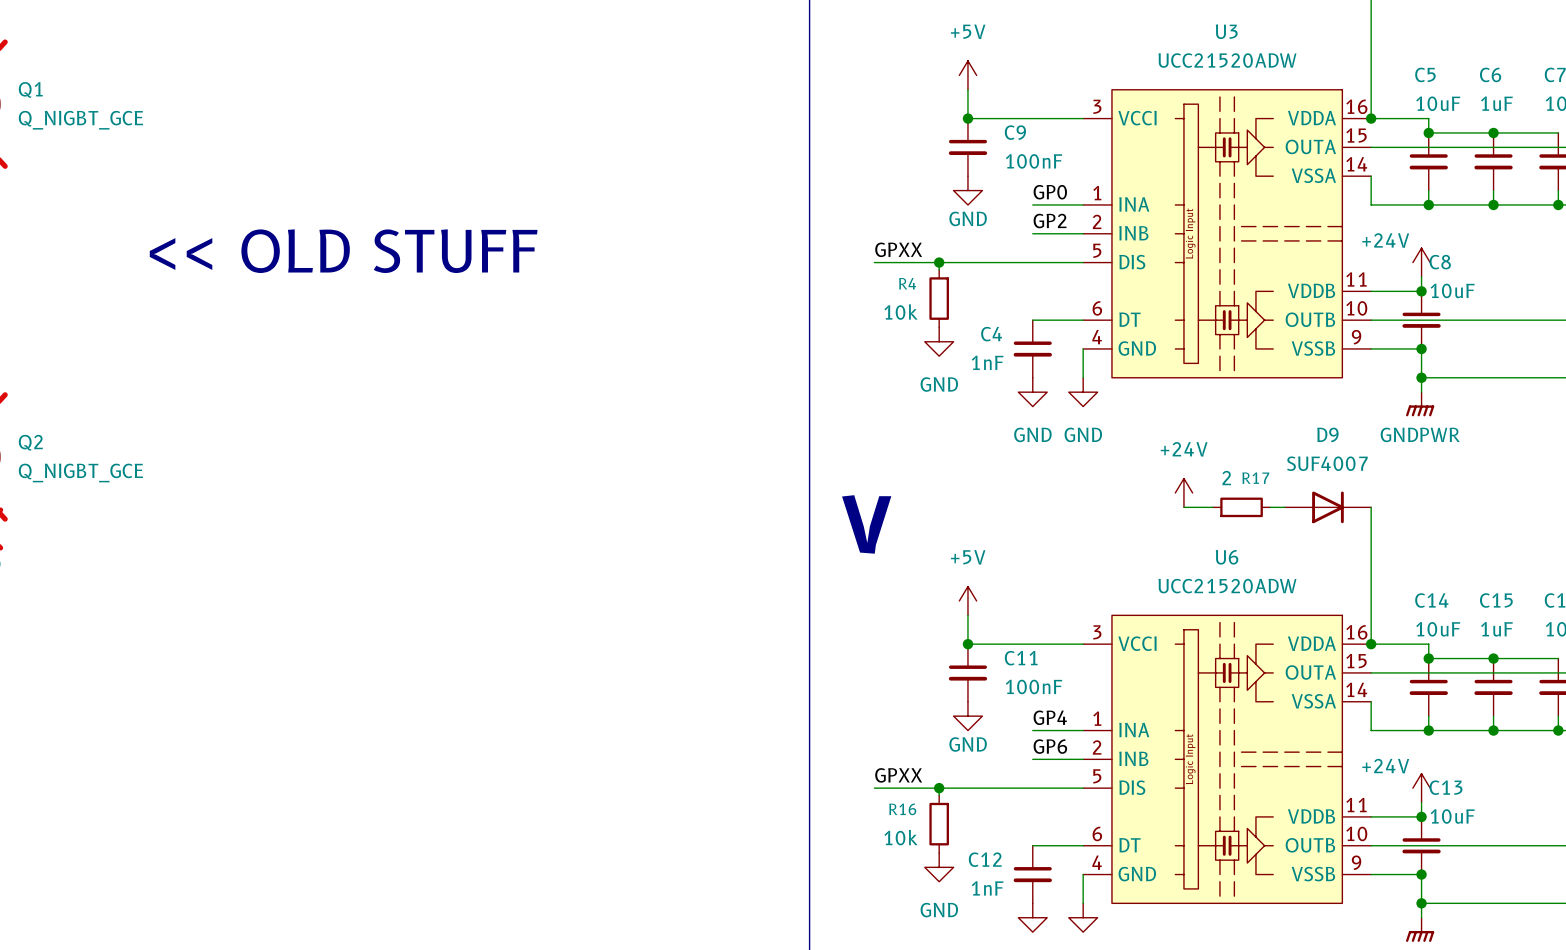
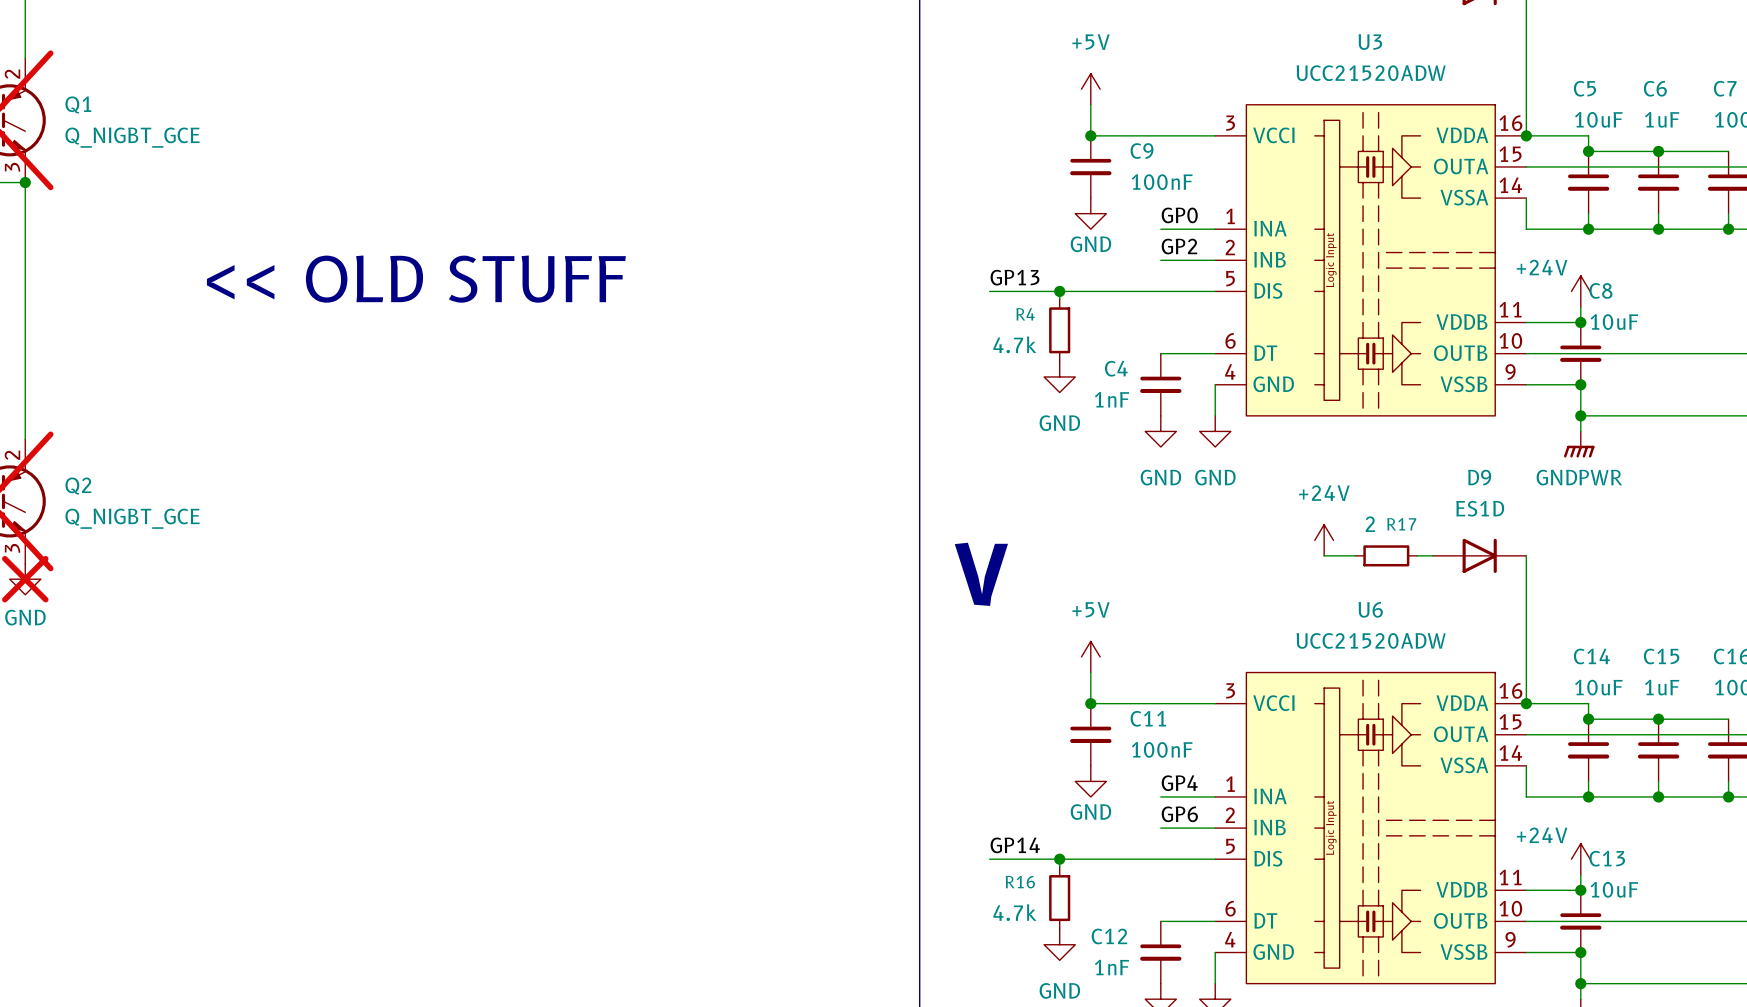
label: GPXX (898, 249) -> GP13 (1015, 277)
R4 value: 10k (900, 312) -> 4.7k (1014, 344)
D9 value: SUF4007 (1327, 463) -> ES1D (1480, 508)
label: GPXX (898, 775) -> GP14 (1015, 845)
R16 value: 10k (900, 837) -> 4.7k (1014, 912)

